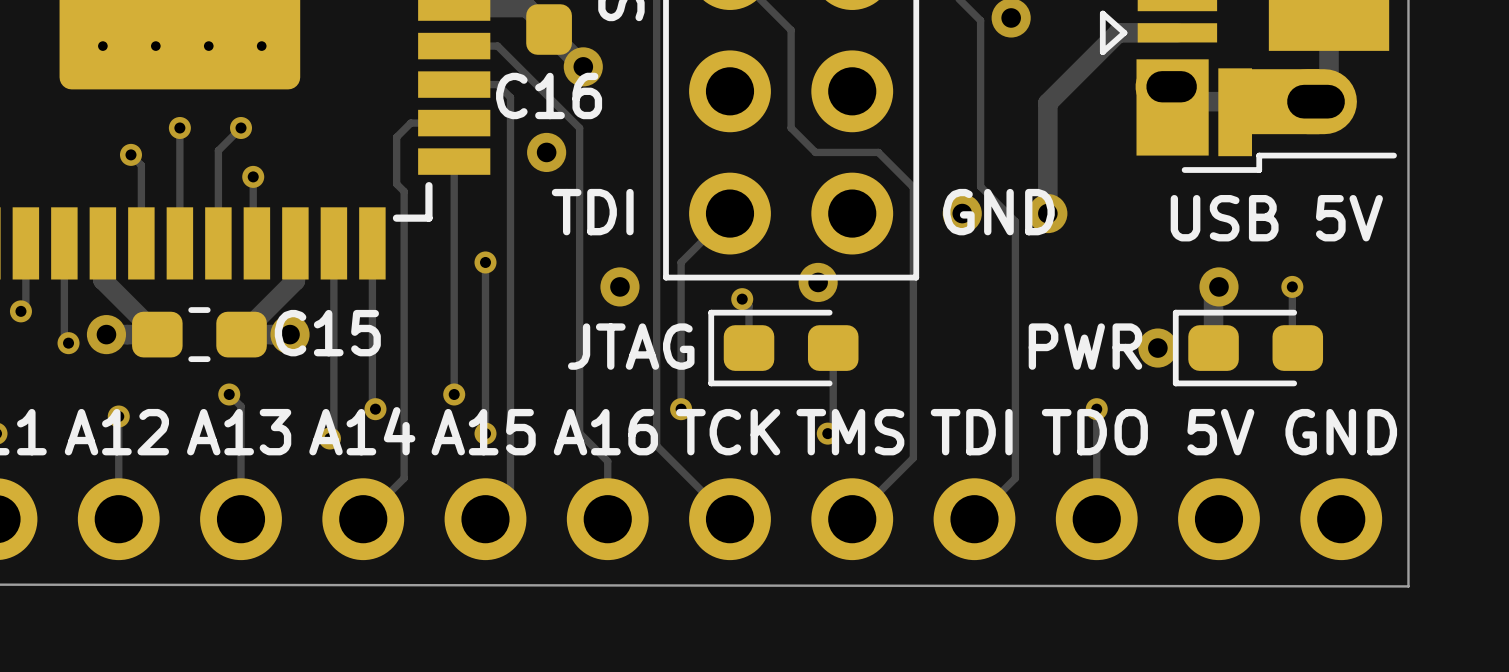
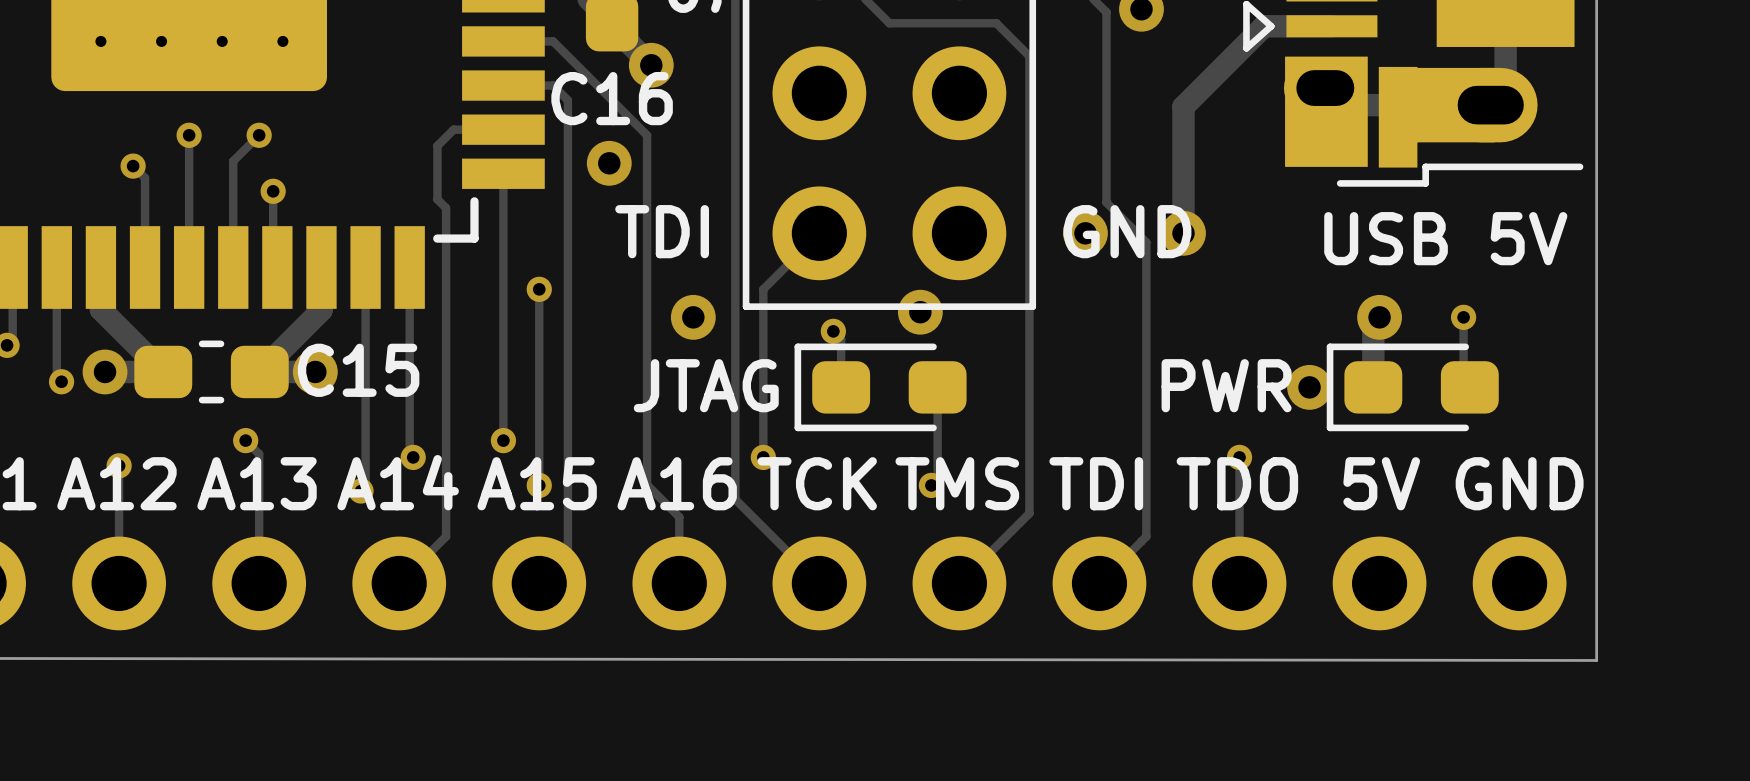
track: (791, 30) (791, 127) (815, 152) (878, 152) (913, 187) -> (889, 23) (996, 23) (1029, 56) (1029, 203)

